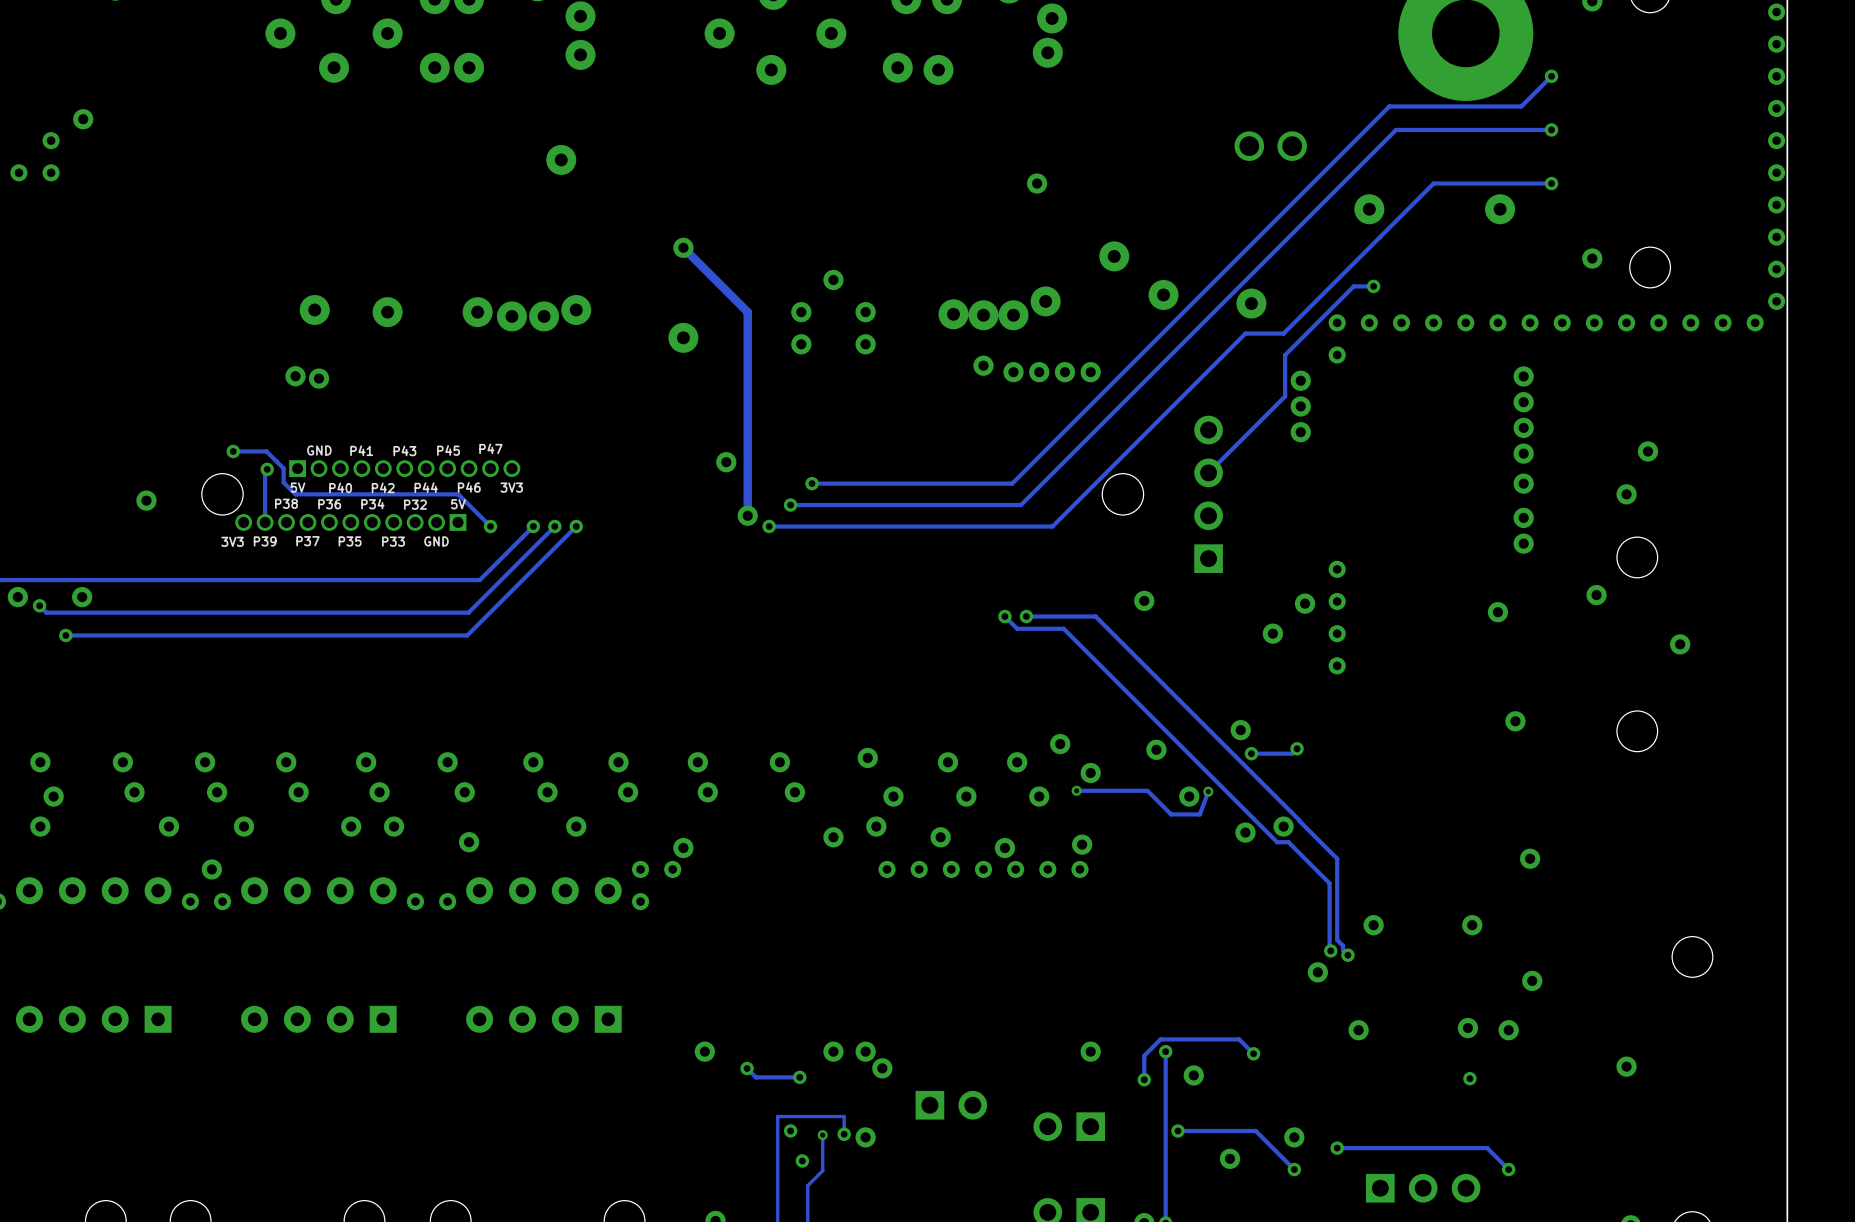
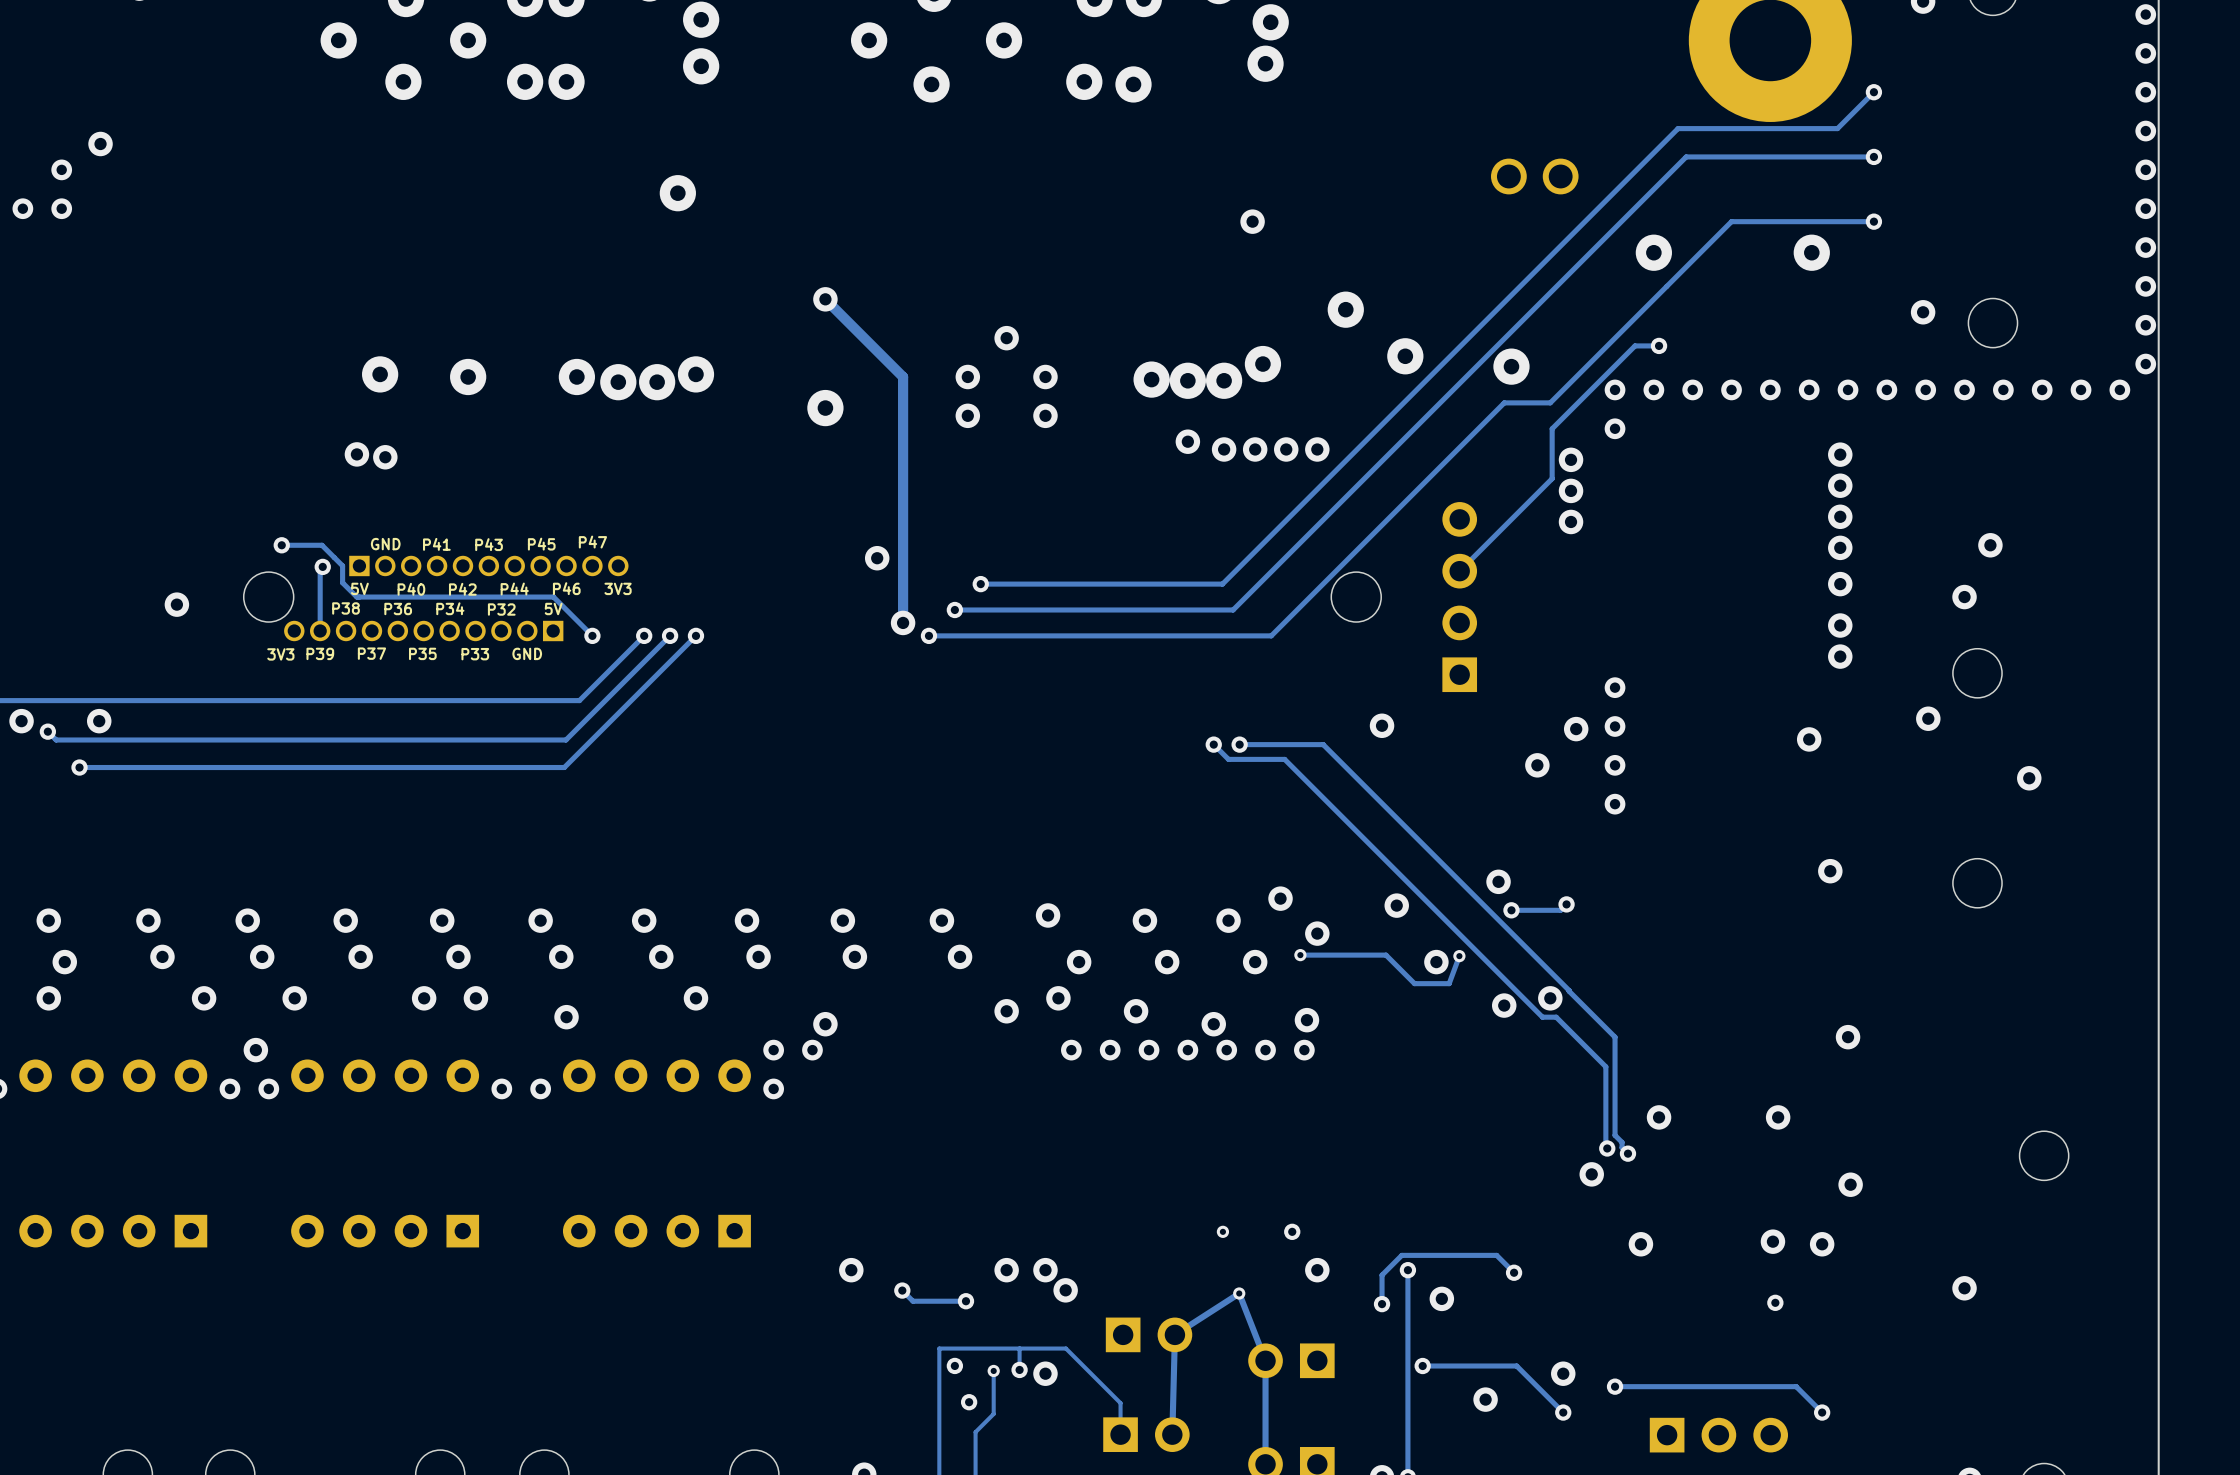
via: none -> (1222, 1231)
via: none -> (1292, 1231)
via: none -> (1239, 1293)
track: none -> (1019, 1348) (1065, 1348) (1120, 1403) (1120, 1434)
part: none -> (1146, 1434)
track: none -> (1172, 1434) (1174, 1334) (1239, 1293) (1265, 1360) (1265, 1464)

